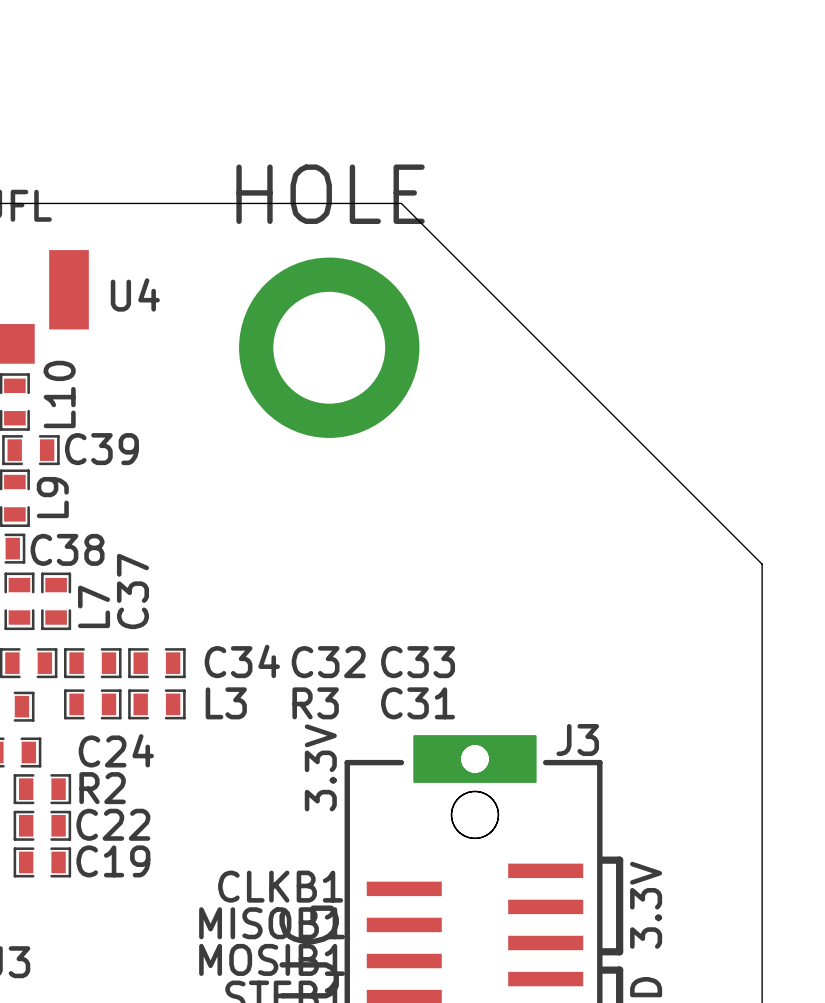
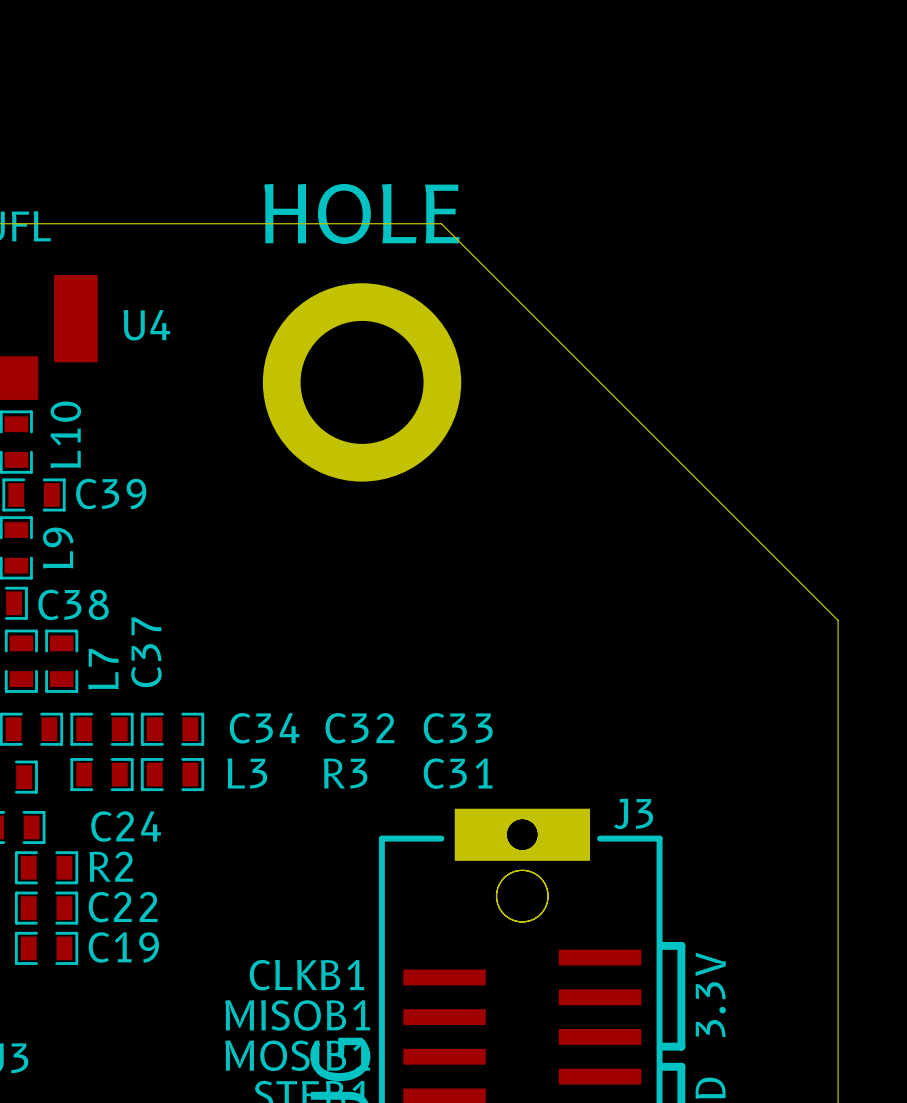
text: 3.3V (320, 767) -> none

